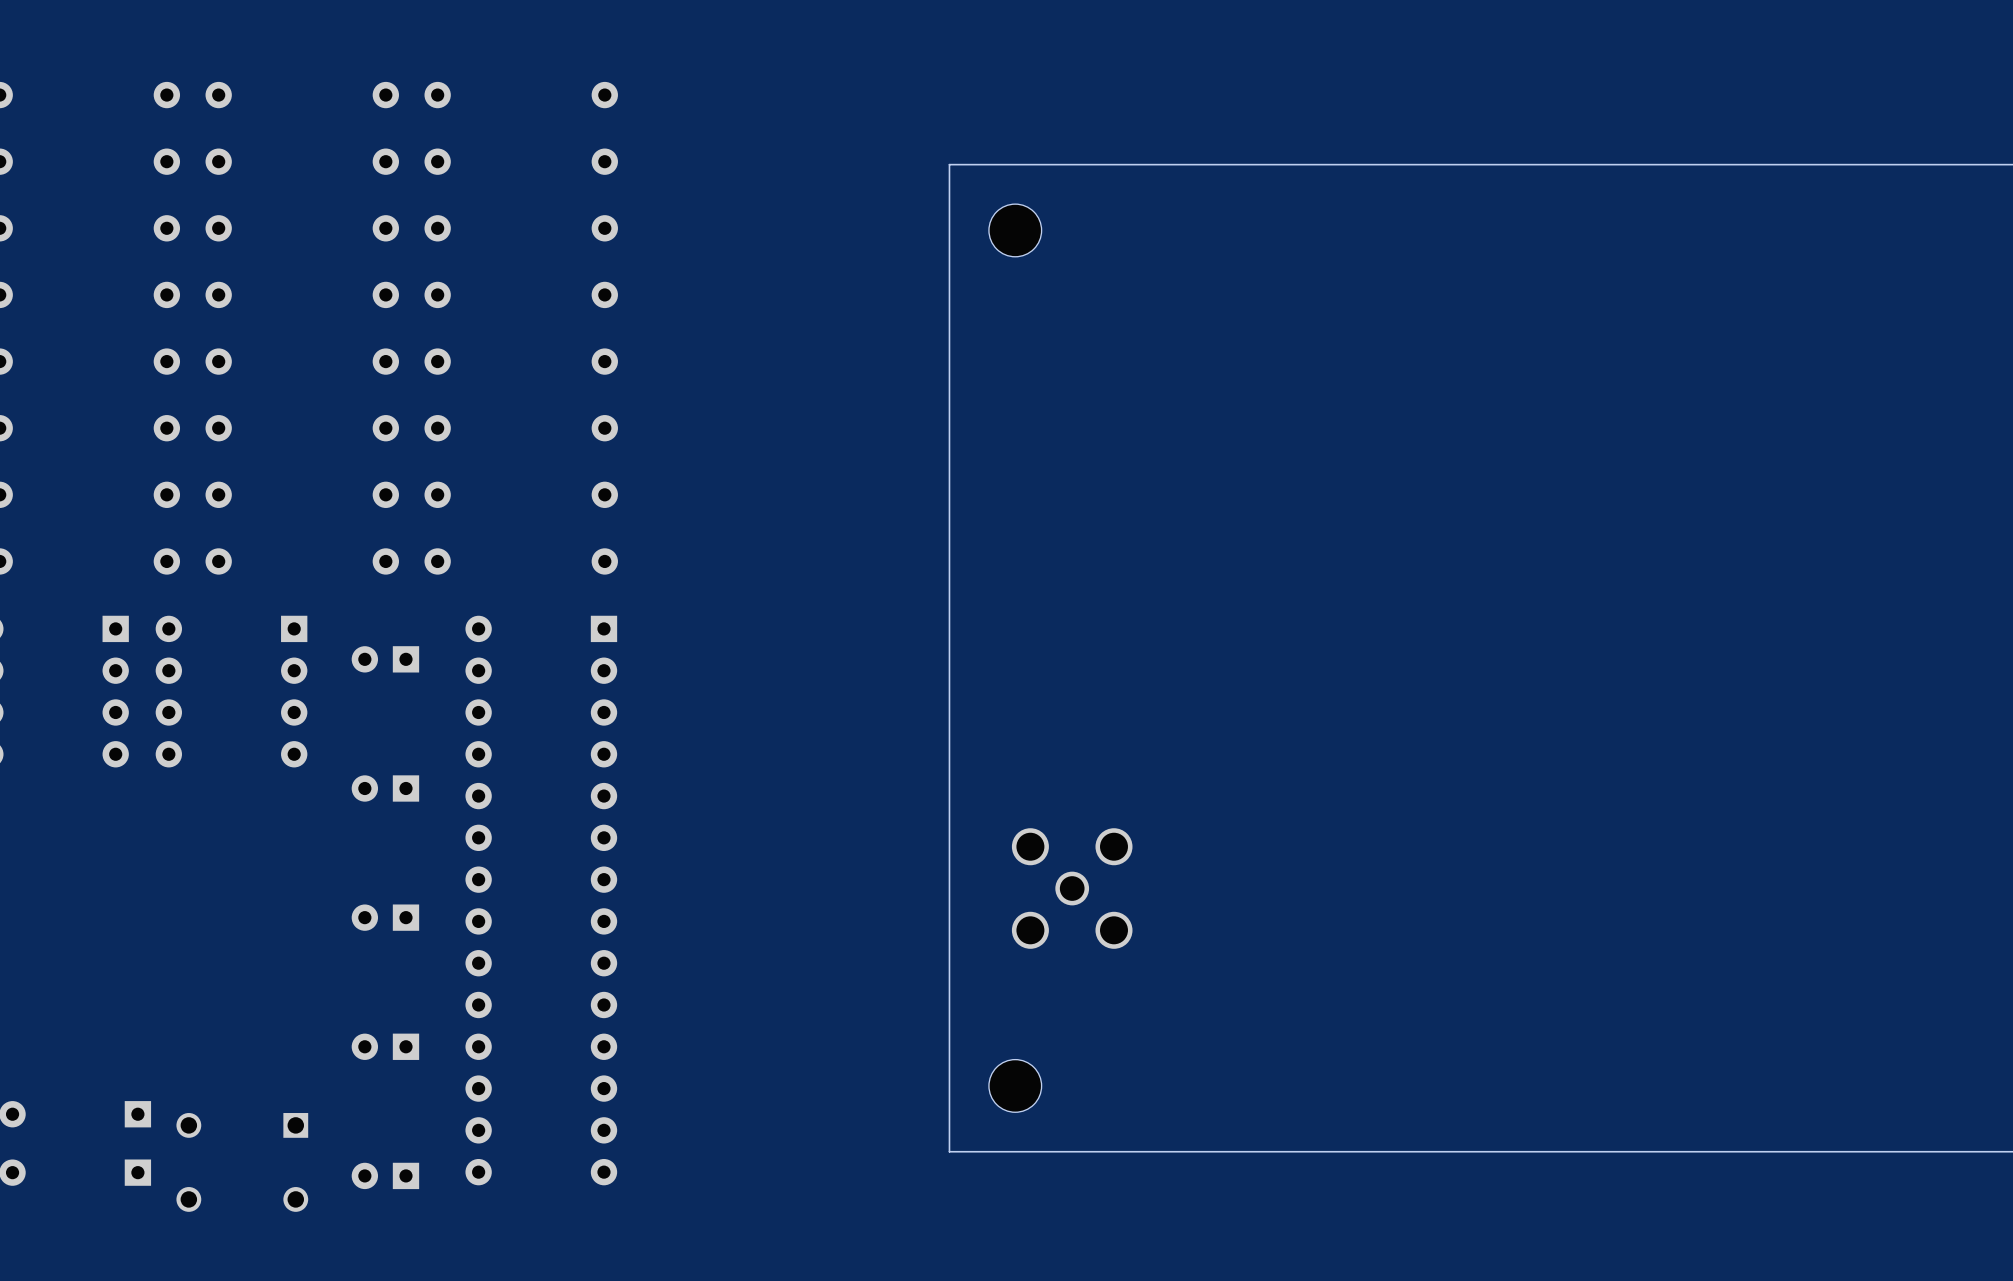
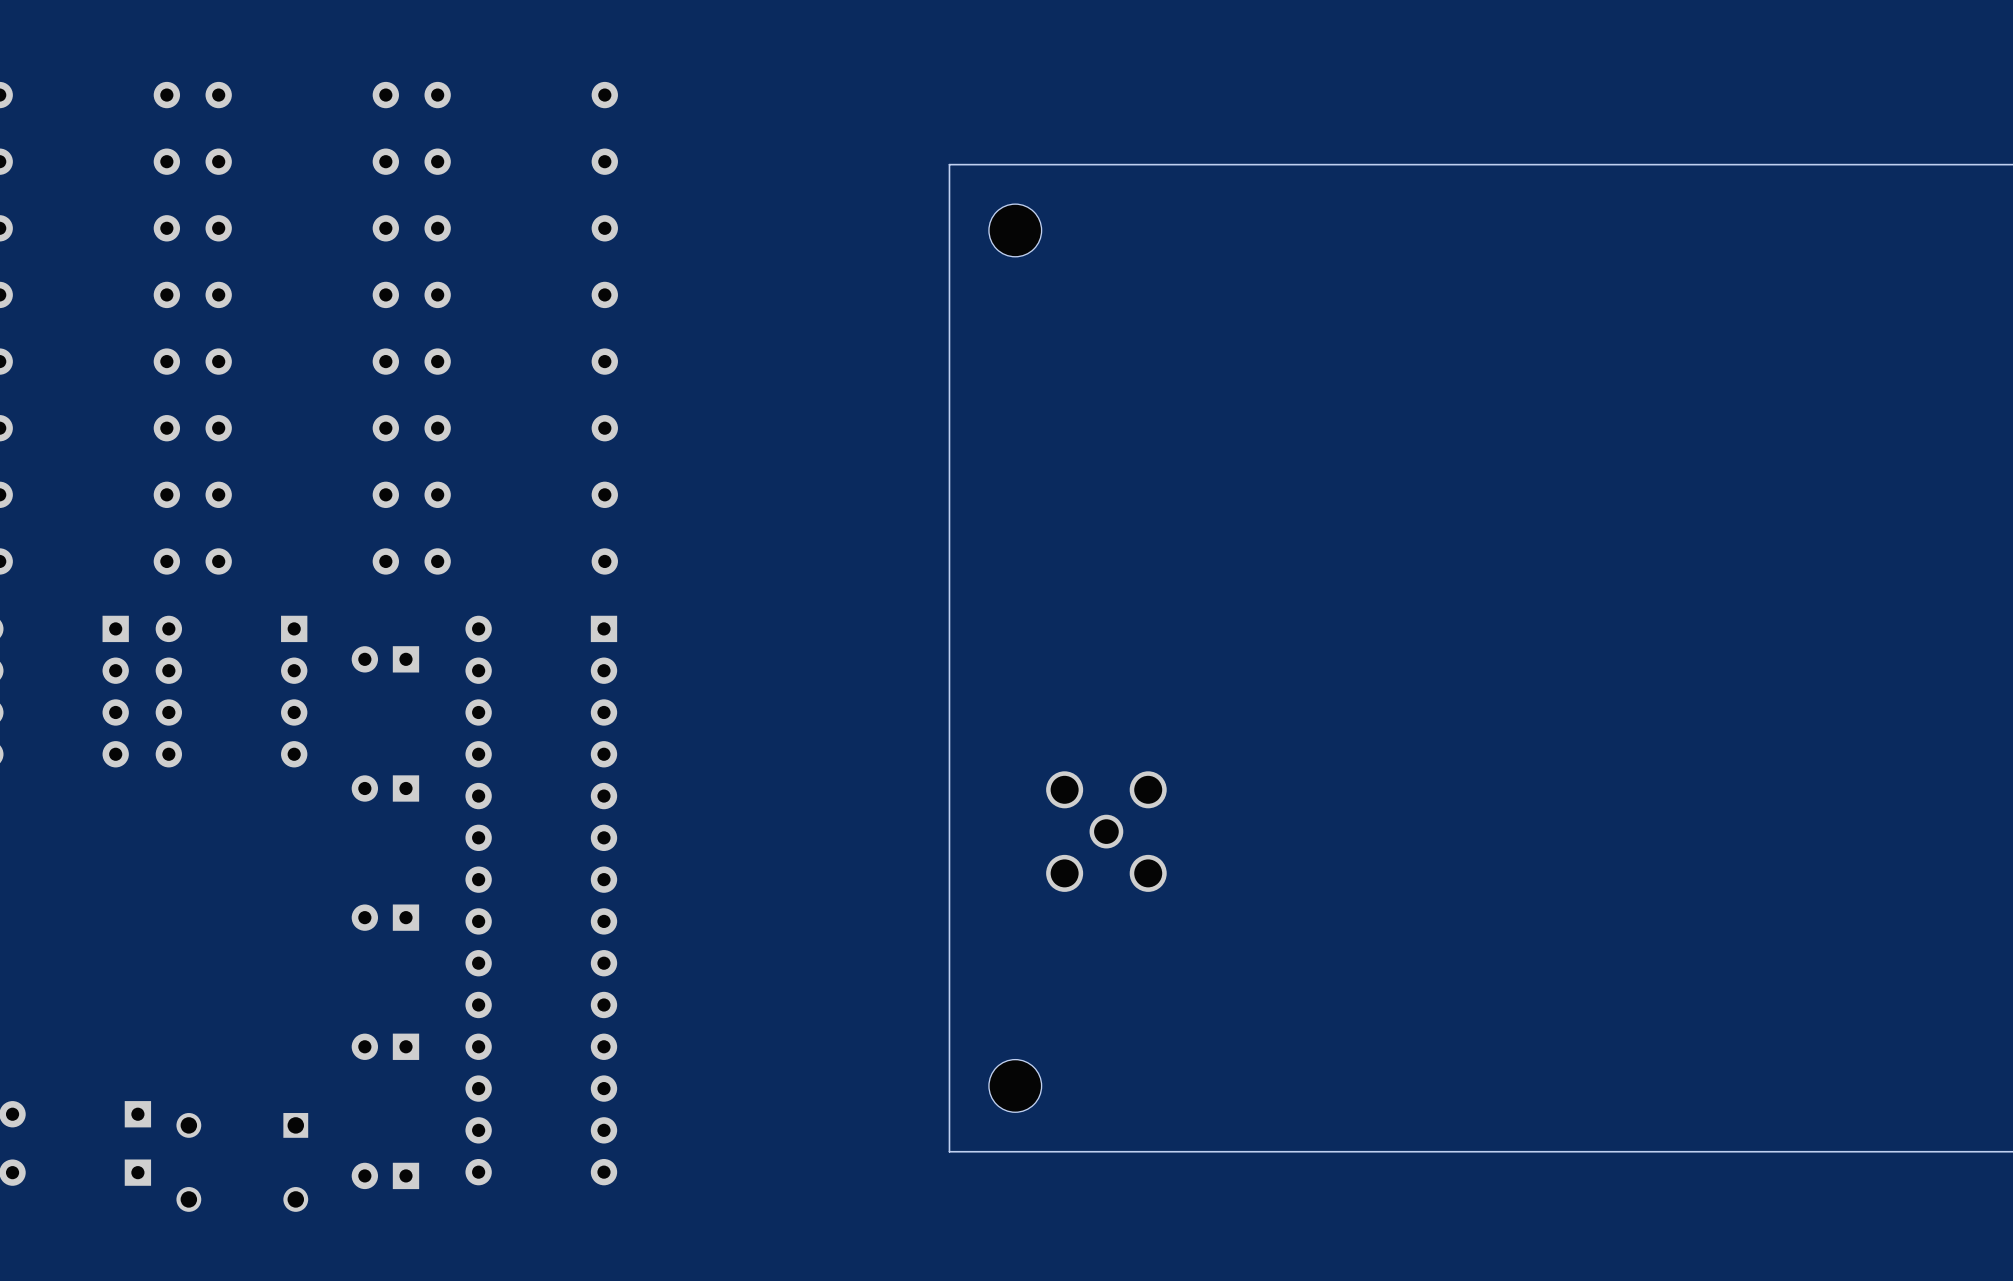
part position: (1072, 888) -> (1106, 831)

